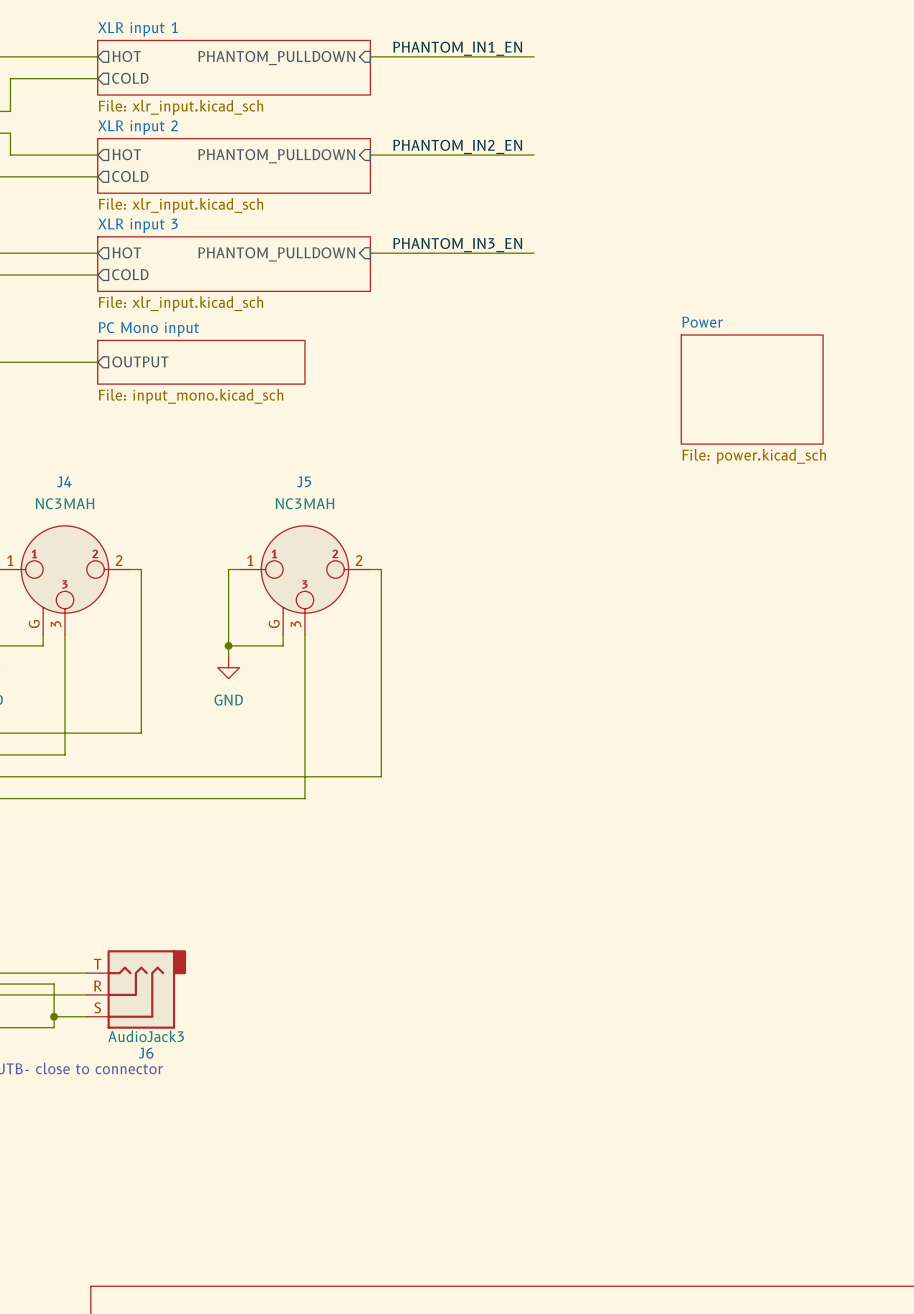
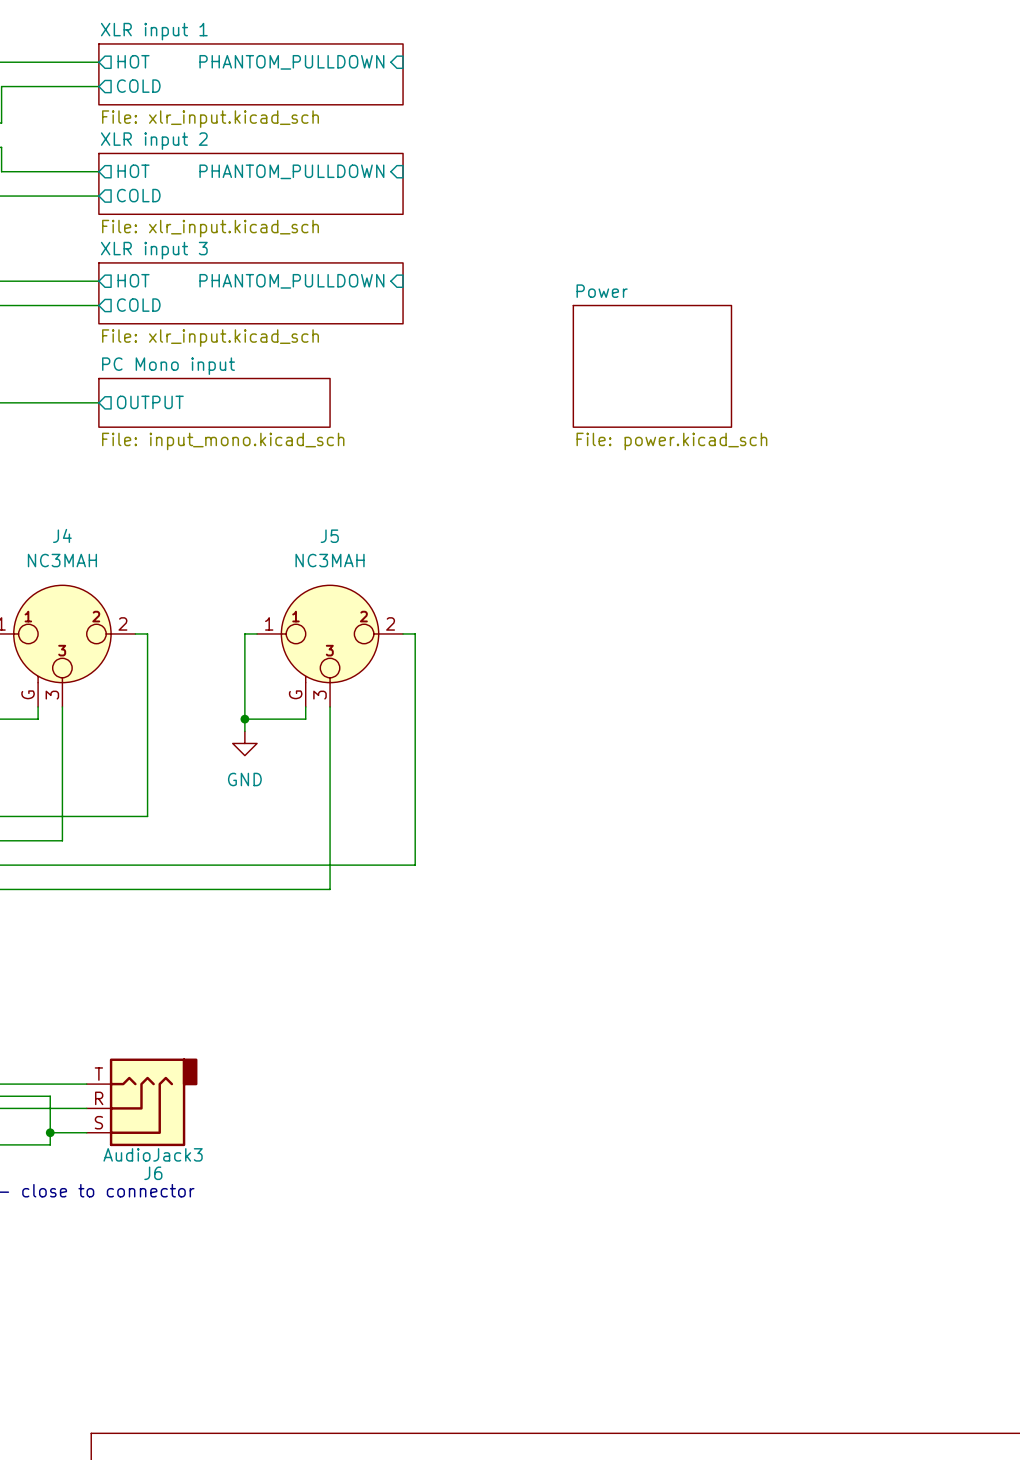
label: PHANTOM_IN1_EN (457, 48) -> none
wire: (370, 56) (534, 56) -> none
label: PHANTOM_IN2_EN (457, 146) -> none
wire: (370, 155) (534, 155) -> none
label: PHANTOM_IN3_EN (457, 245) -> none
wire: (370, 253) (534, 253) -> none
sheet Power position: (752, 389) -> (652, 366)

